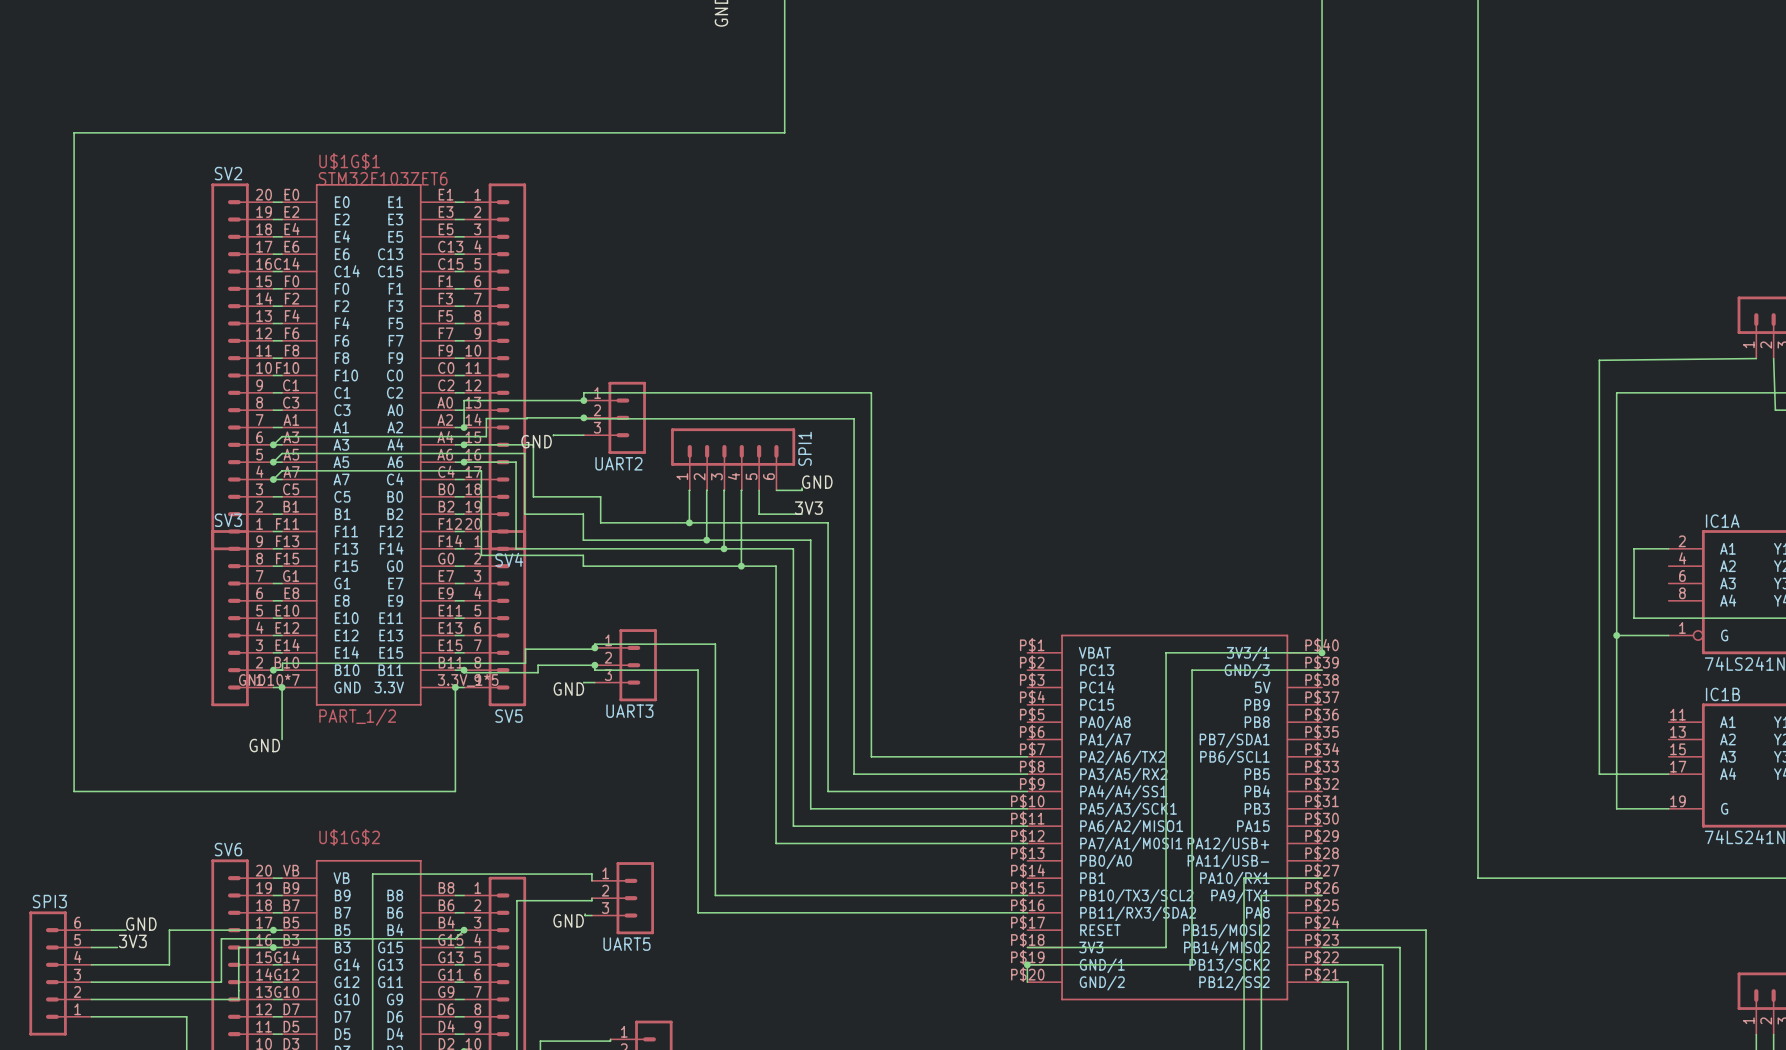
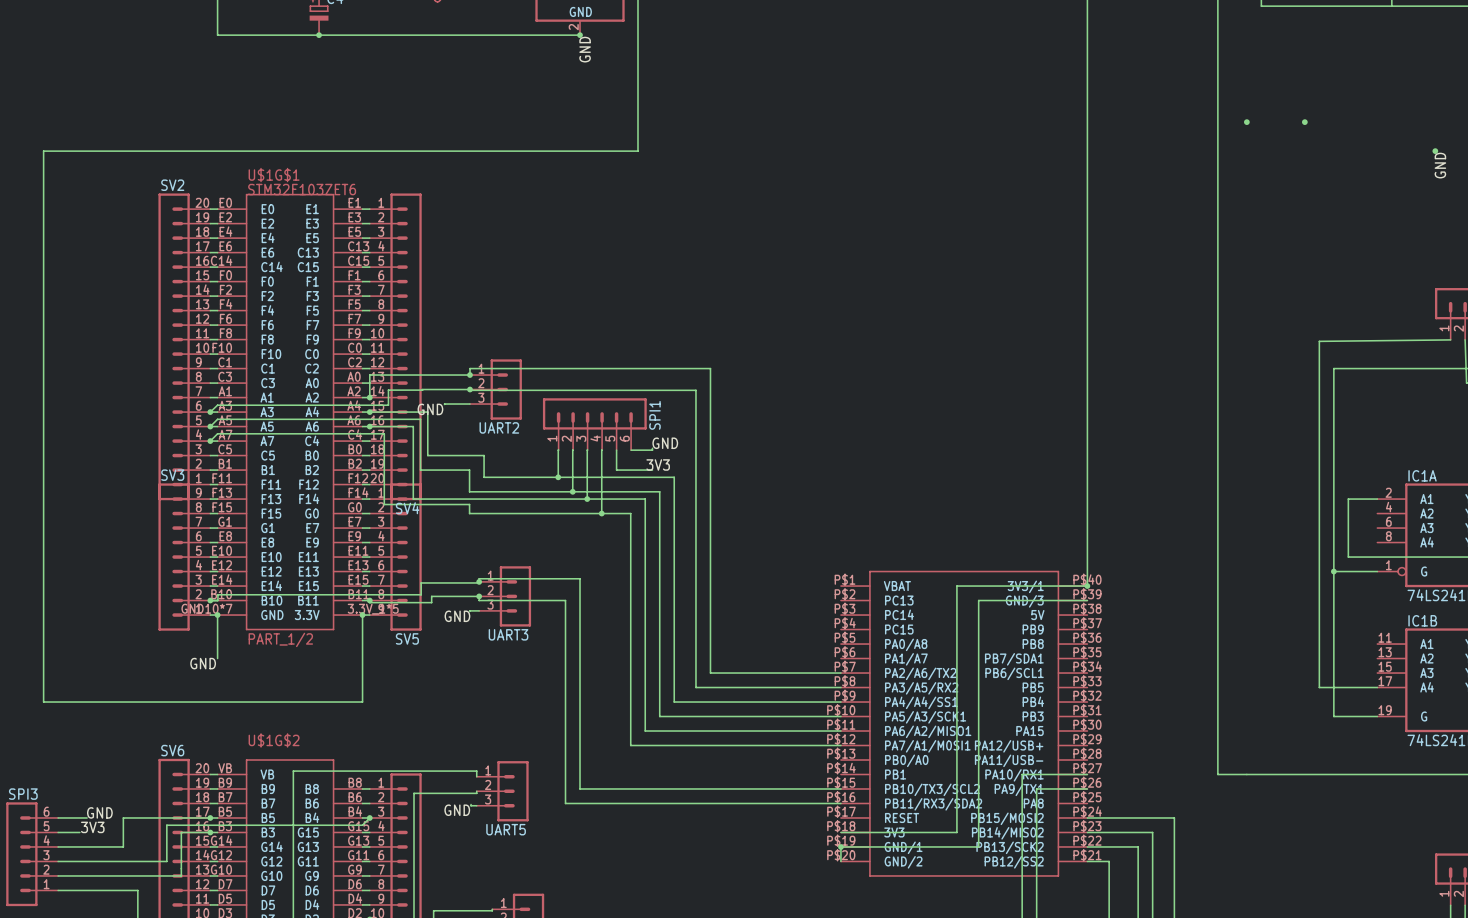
junction: none -> (1246, 122)
junction: none -> (1304, 122)
junction: none -> (1435, 151)
label: none -> GND (1440, 165)

